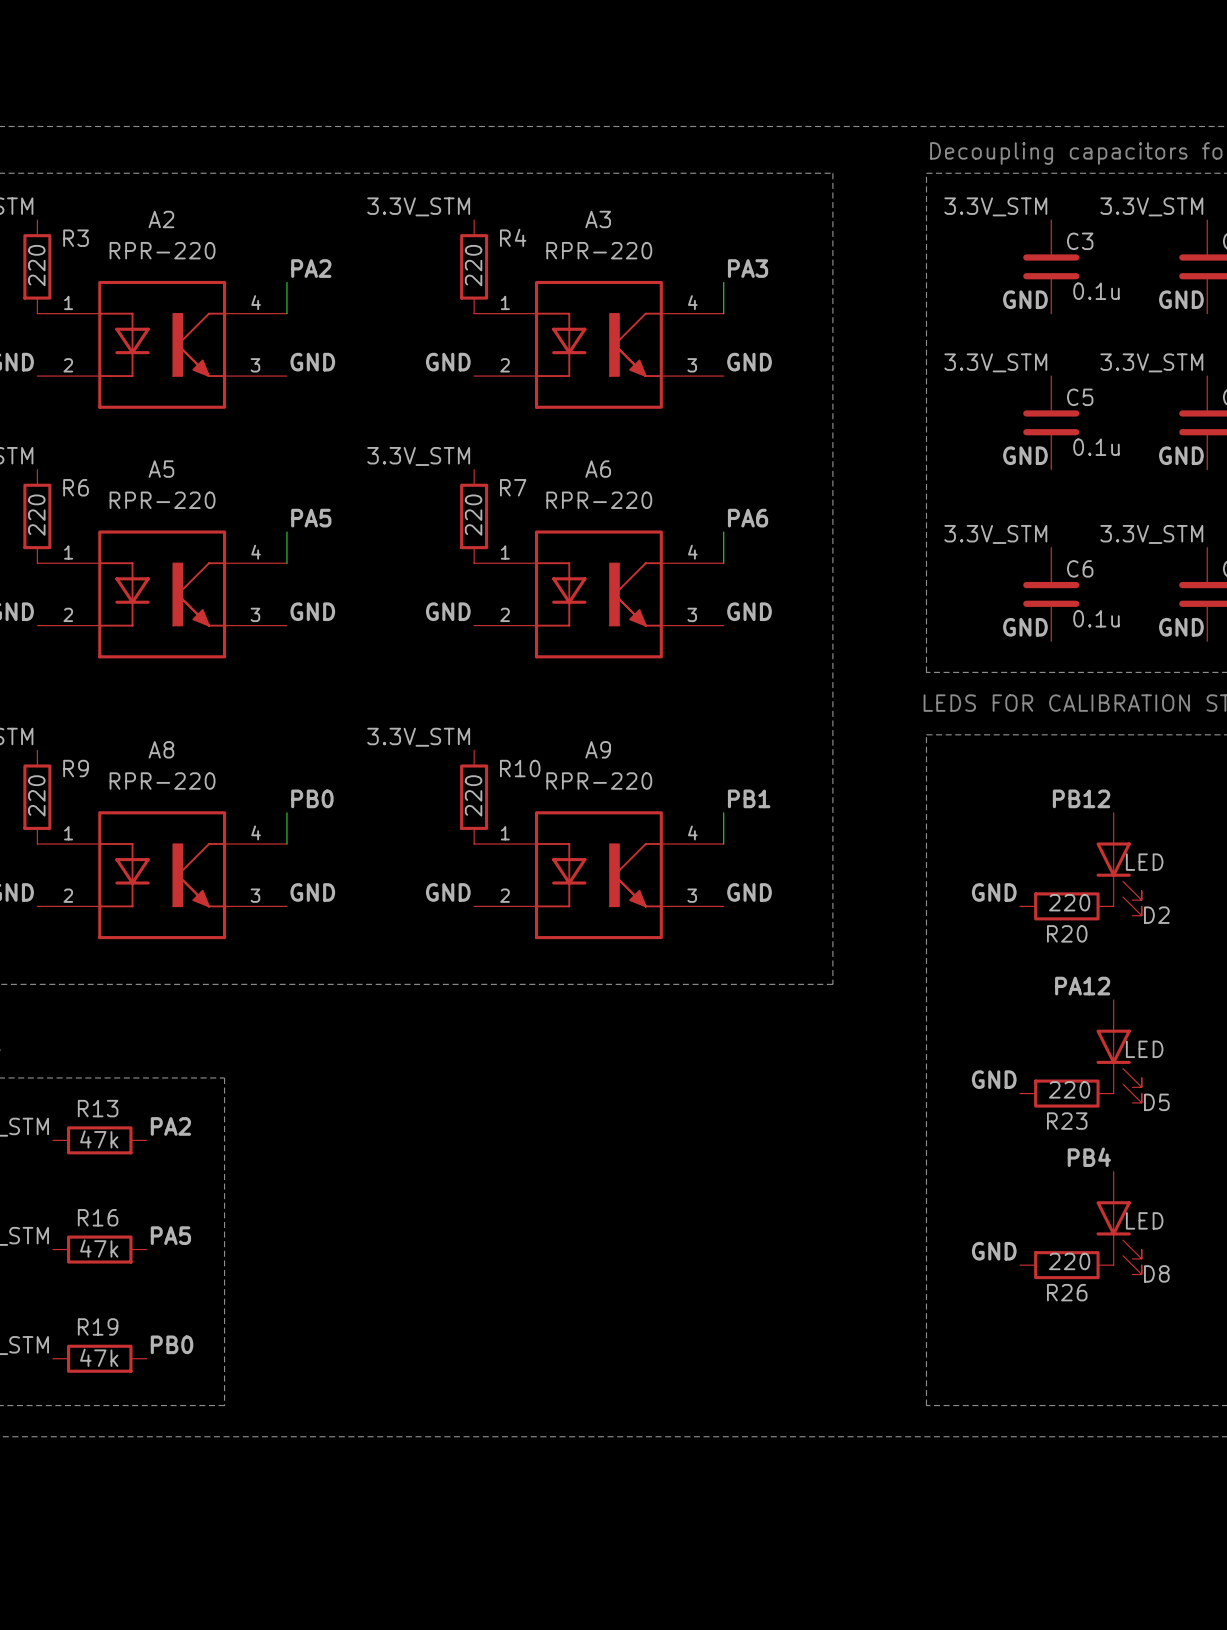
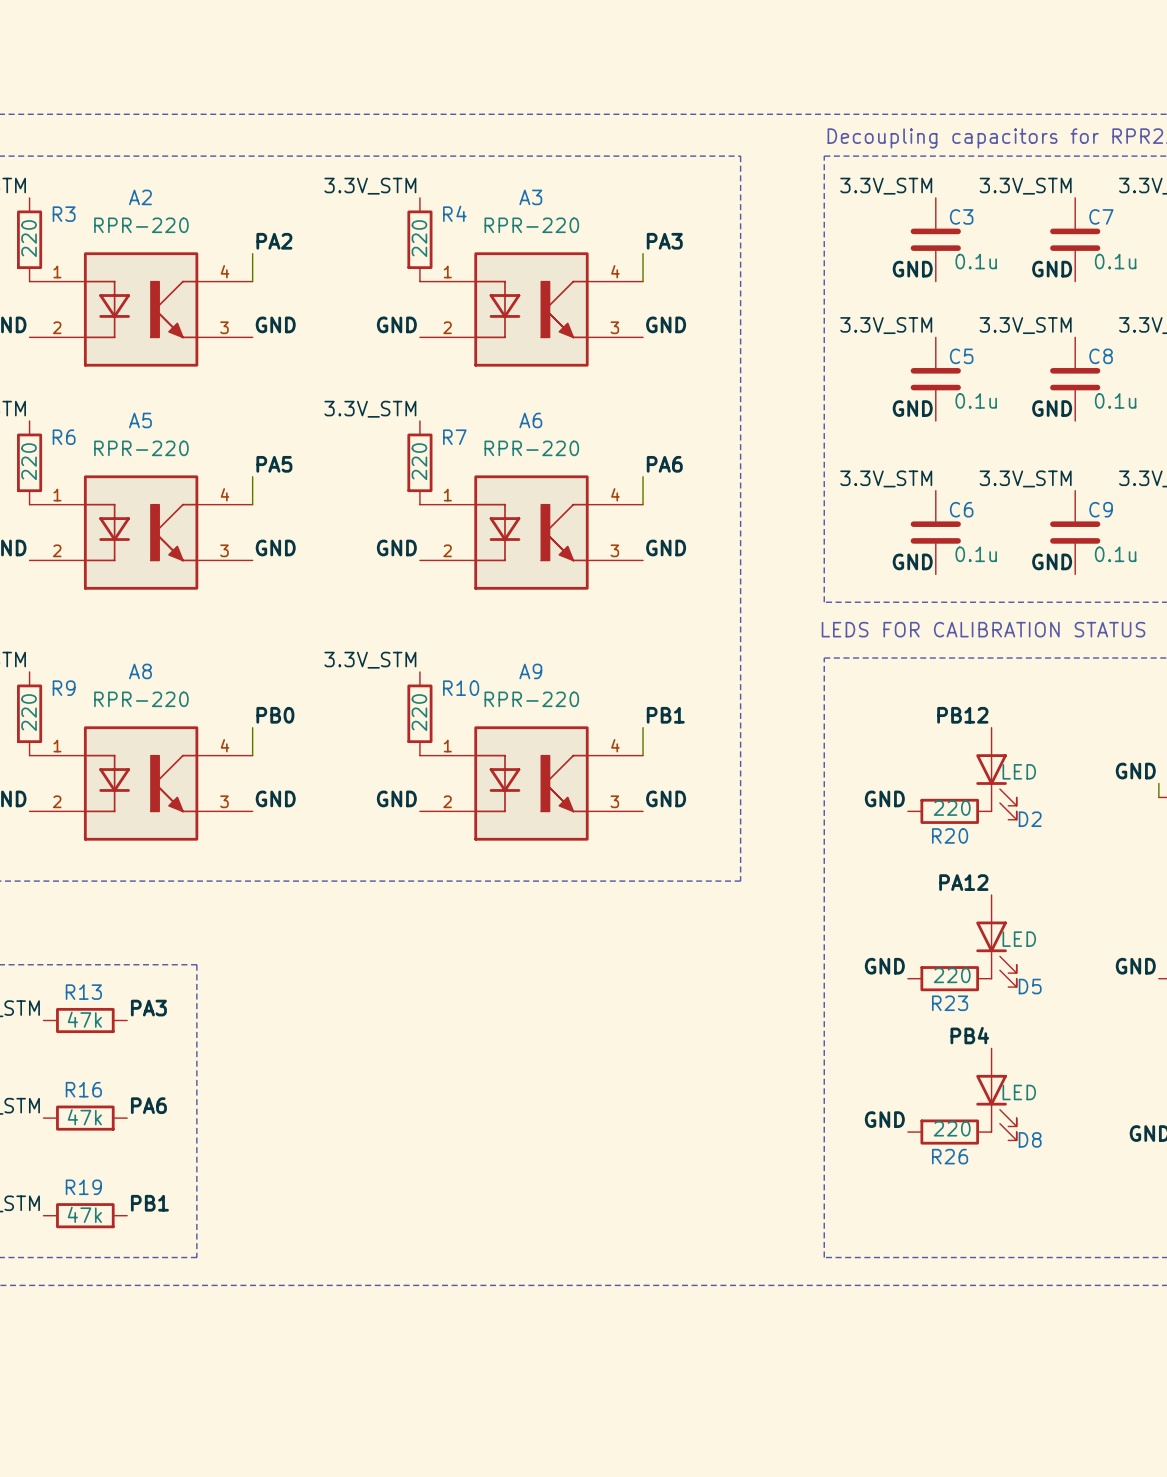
label: PA2 (170, 1126) -> PA3 (148, 1008)
label: PA5 (170, 1235) -> PA6 (148, 1105)
label: PB0 (172, 1344) -> PB1 (149, 1203)

